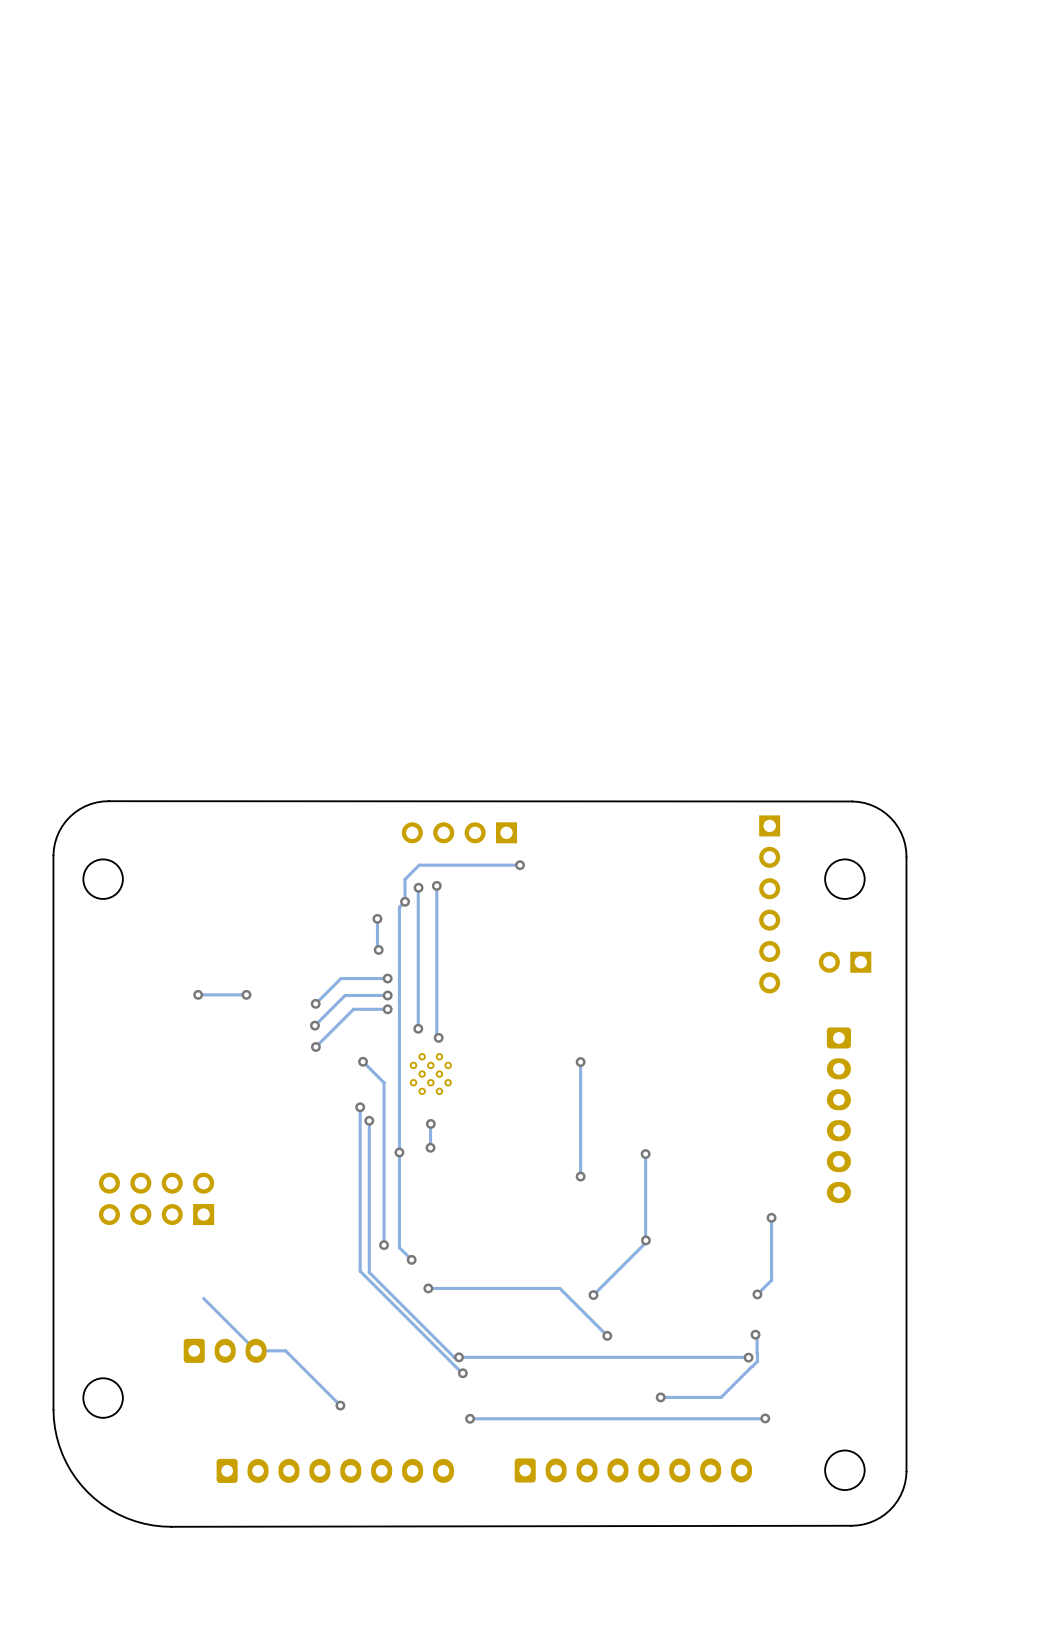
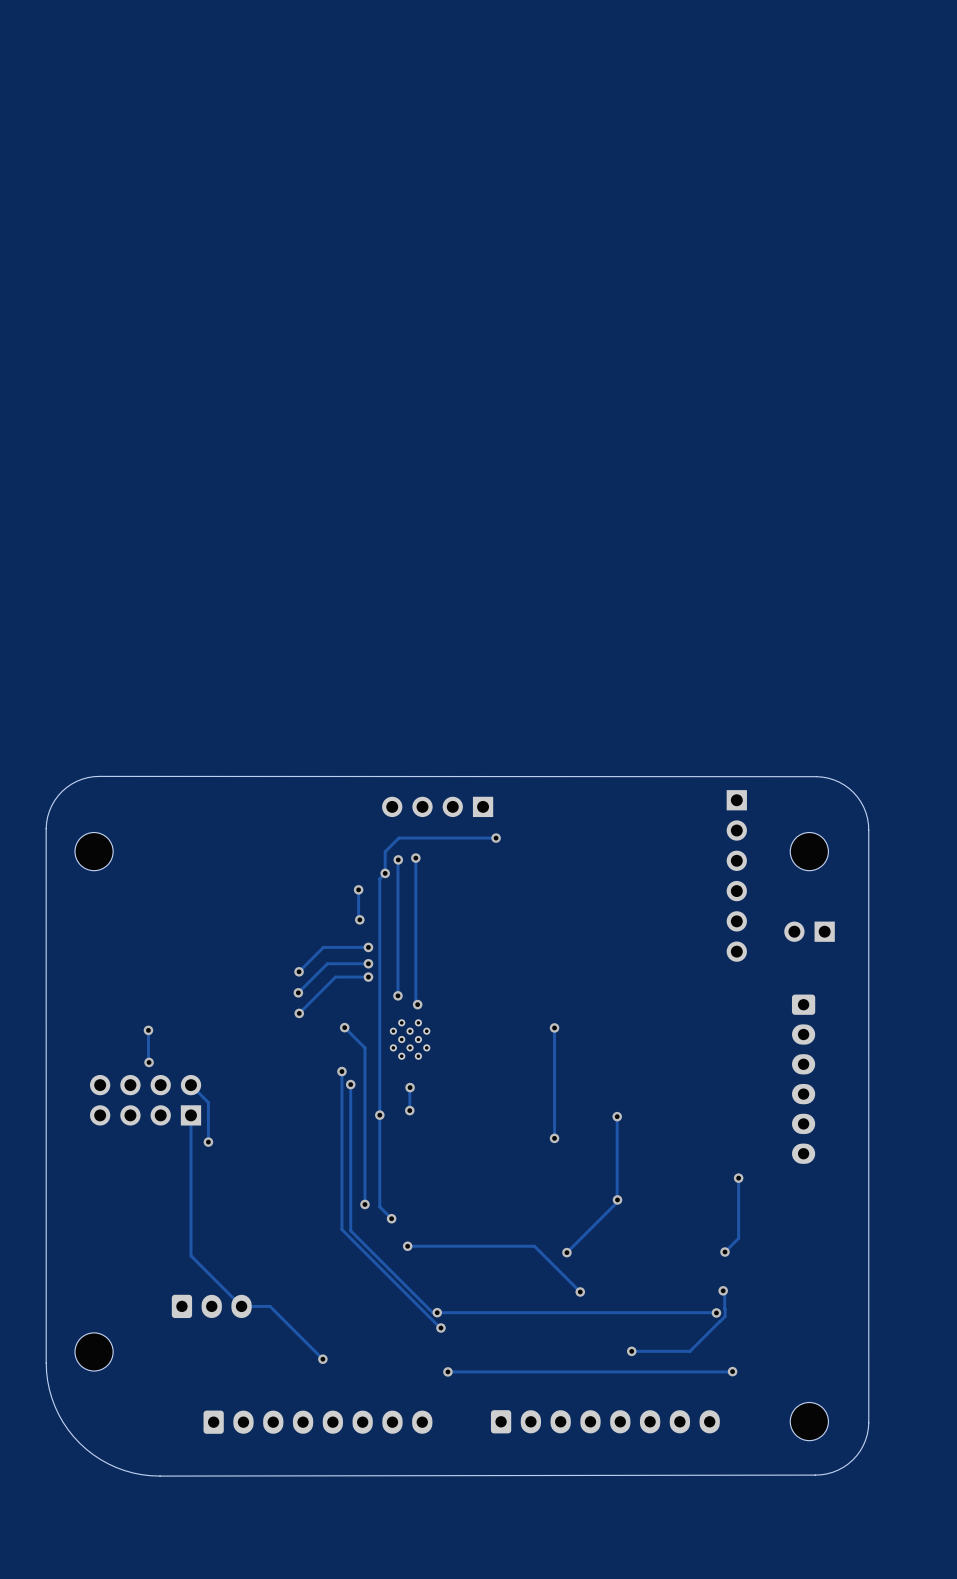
via: (198, 994) -> none
track: (246, 994) (198, 994) -> none
via: (246, 994) -> none
track: none -> (148, 1030) (149, 1062)
via: none -> (148, 1030)
via: none -> (149, 1062)
track: none -> (190, 1085) (208, 1102) (208, 1142)
track: none -> (190, 1115) (190, 1255)
via: none -> (208, 1142)
part position: (156, 1198) -> (145, 1100)

